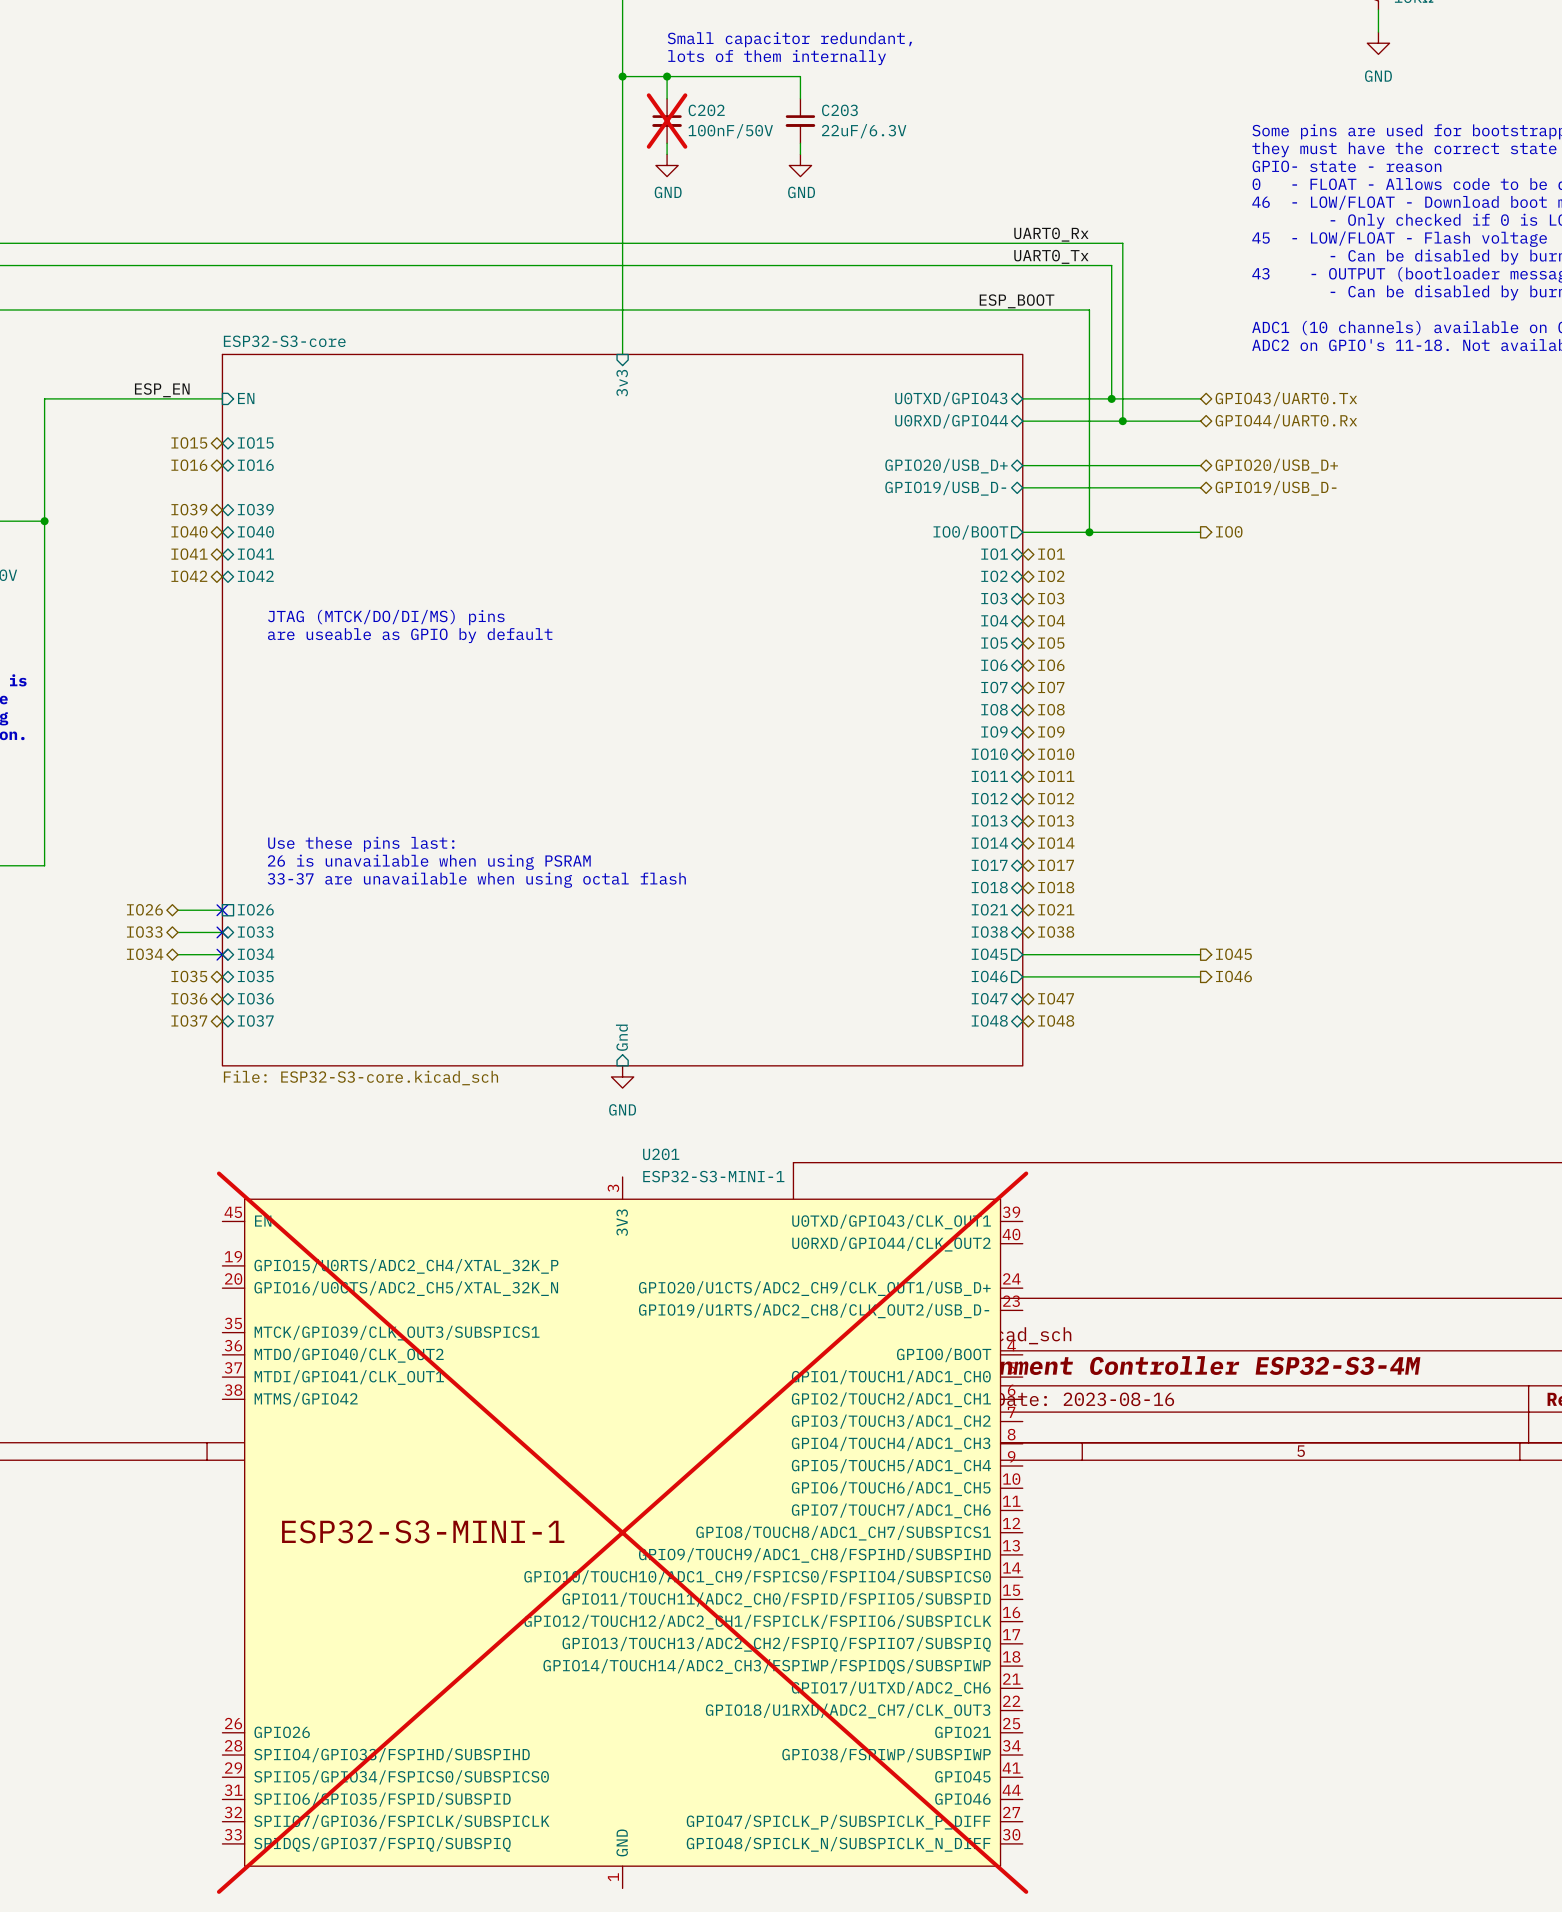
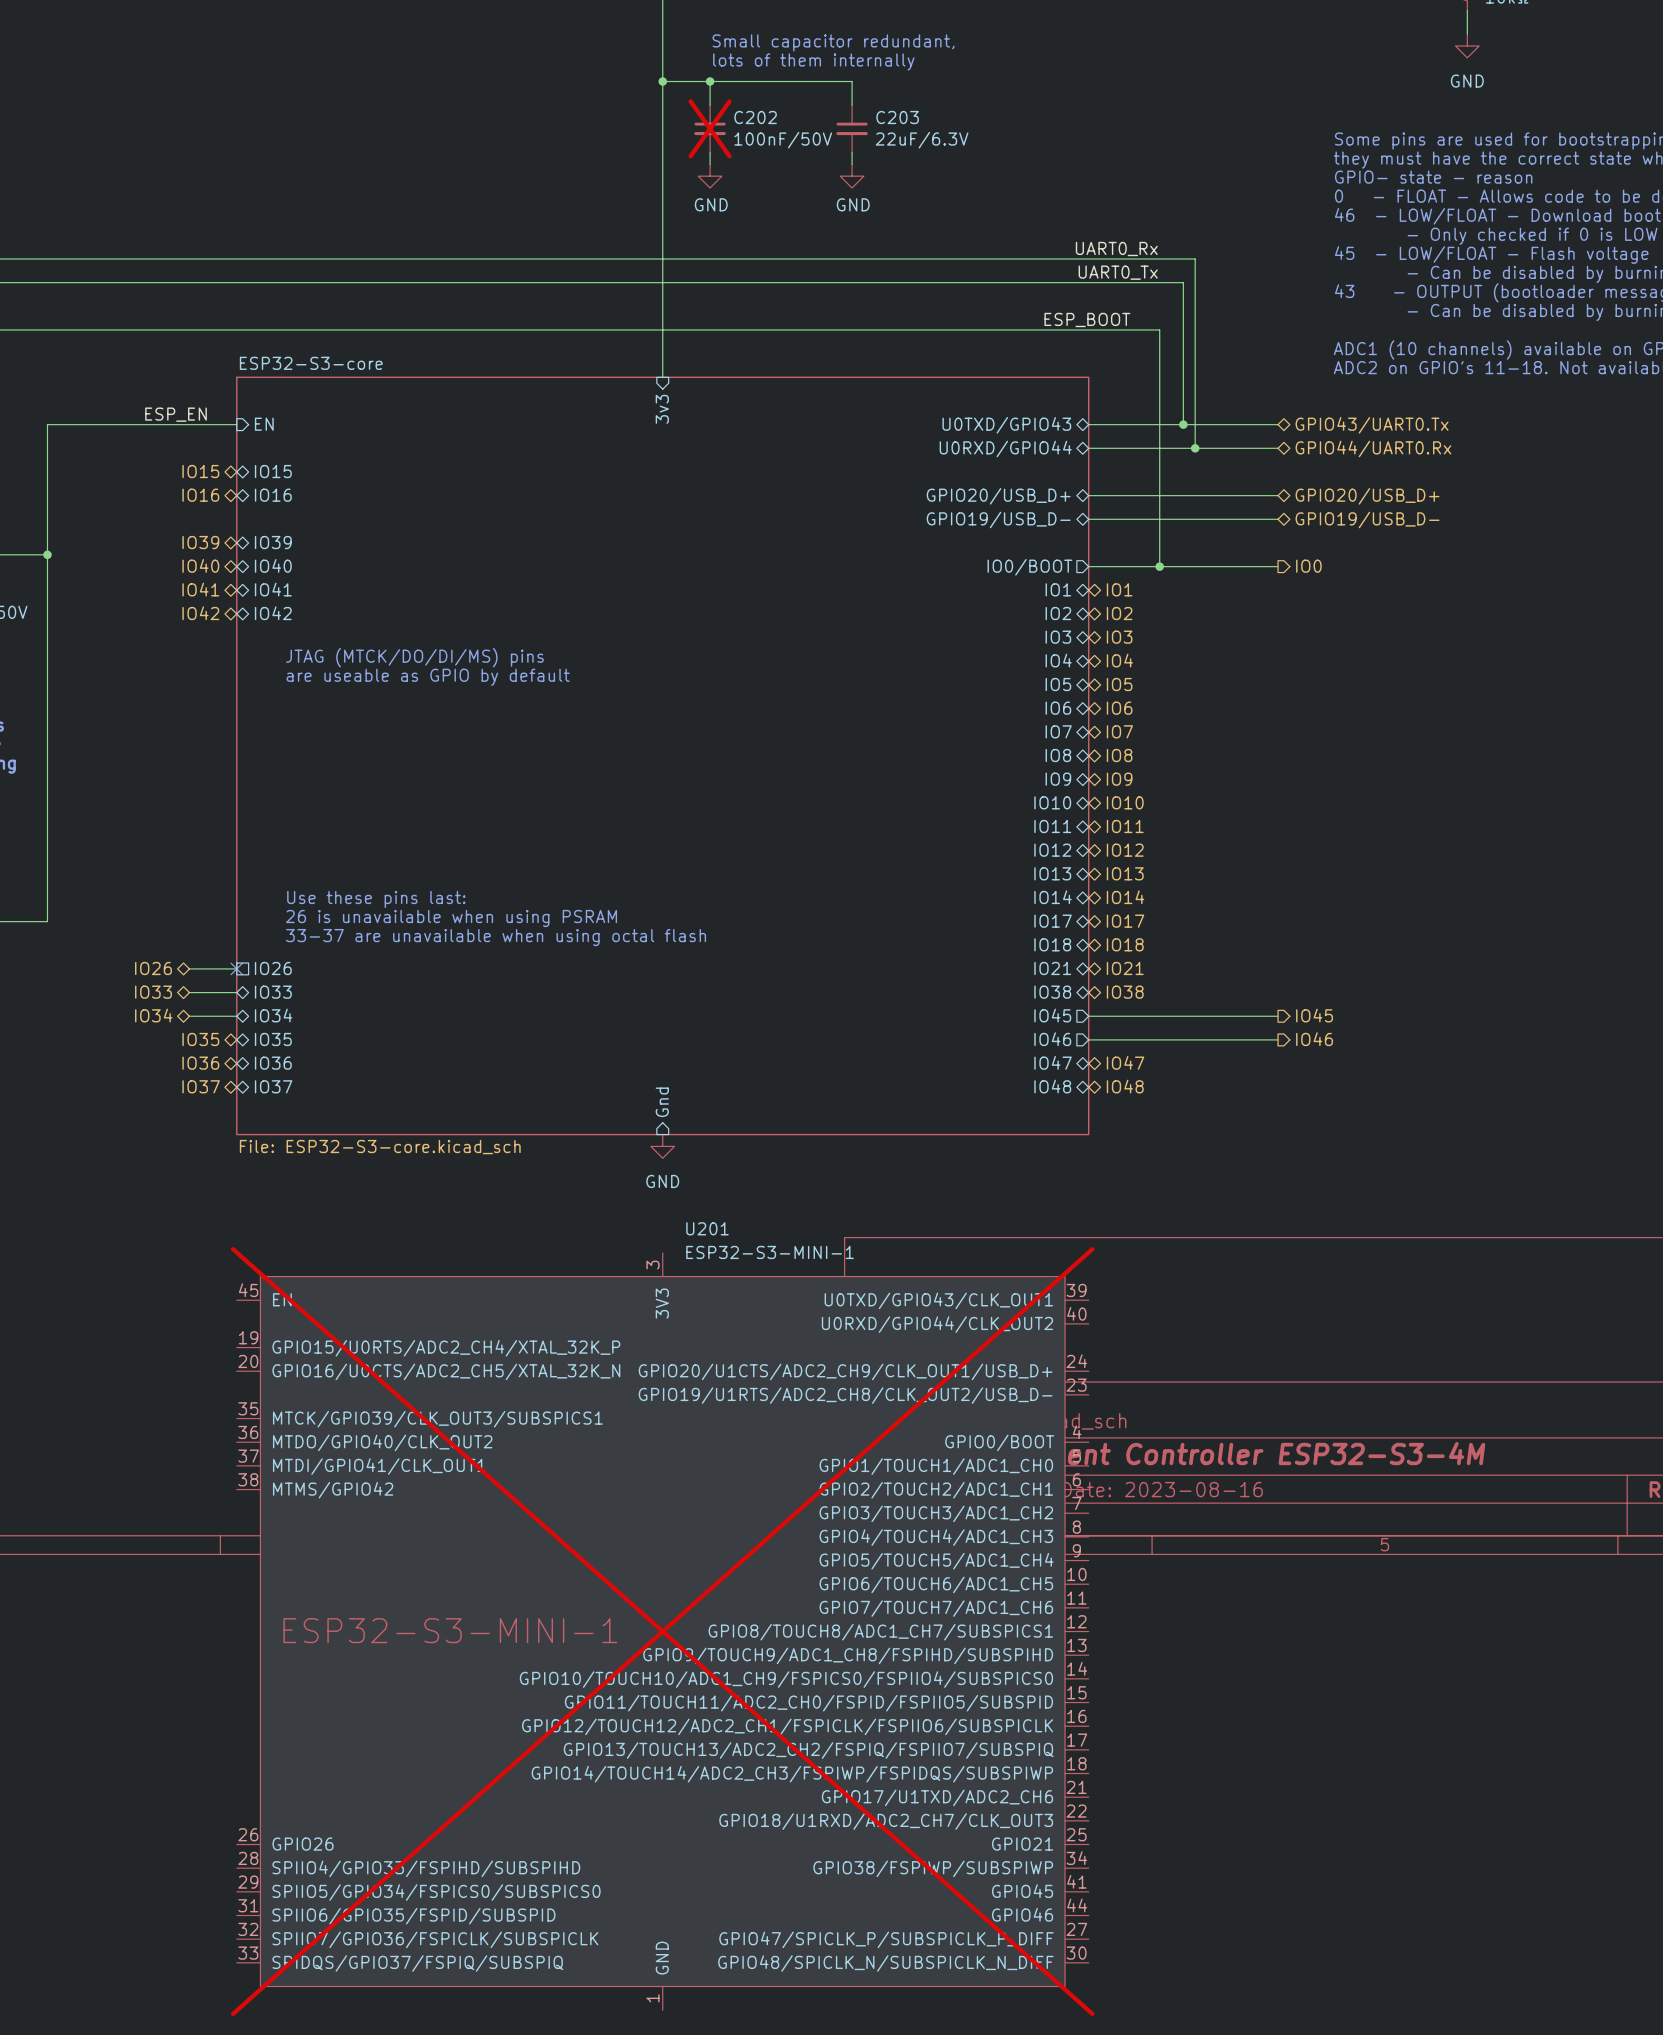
no-connect mark: (222, 932) -> none
no-connect mark: (222, 954) -> none

